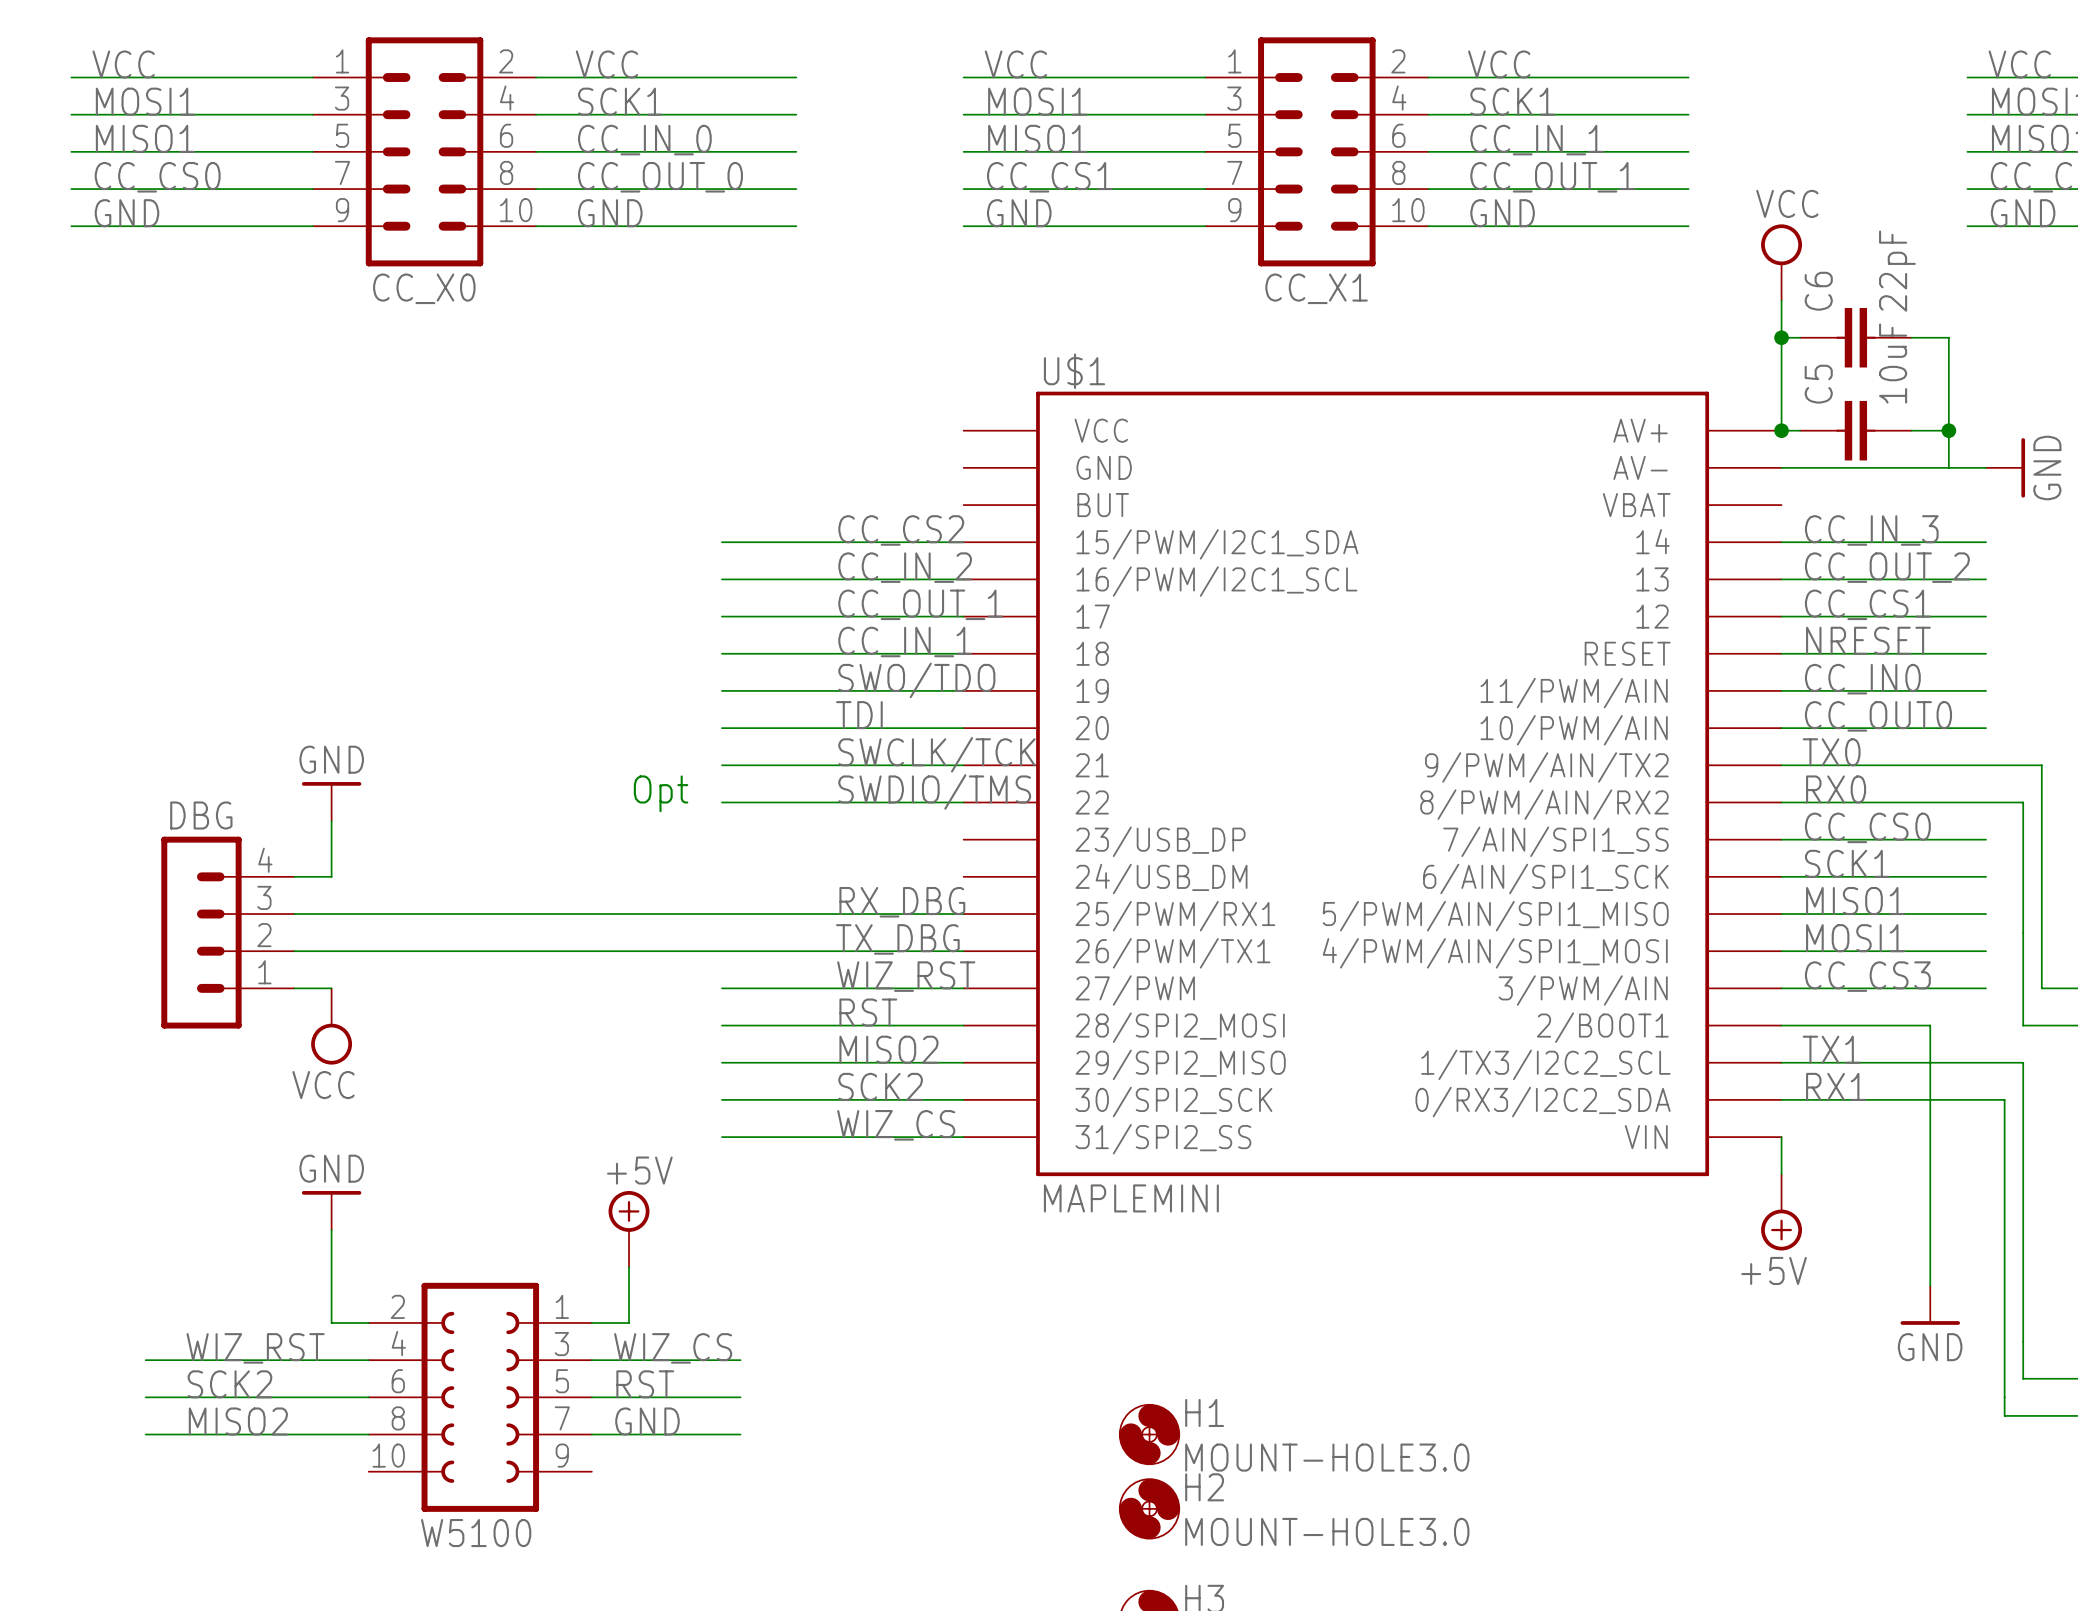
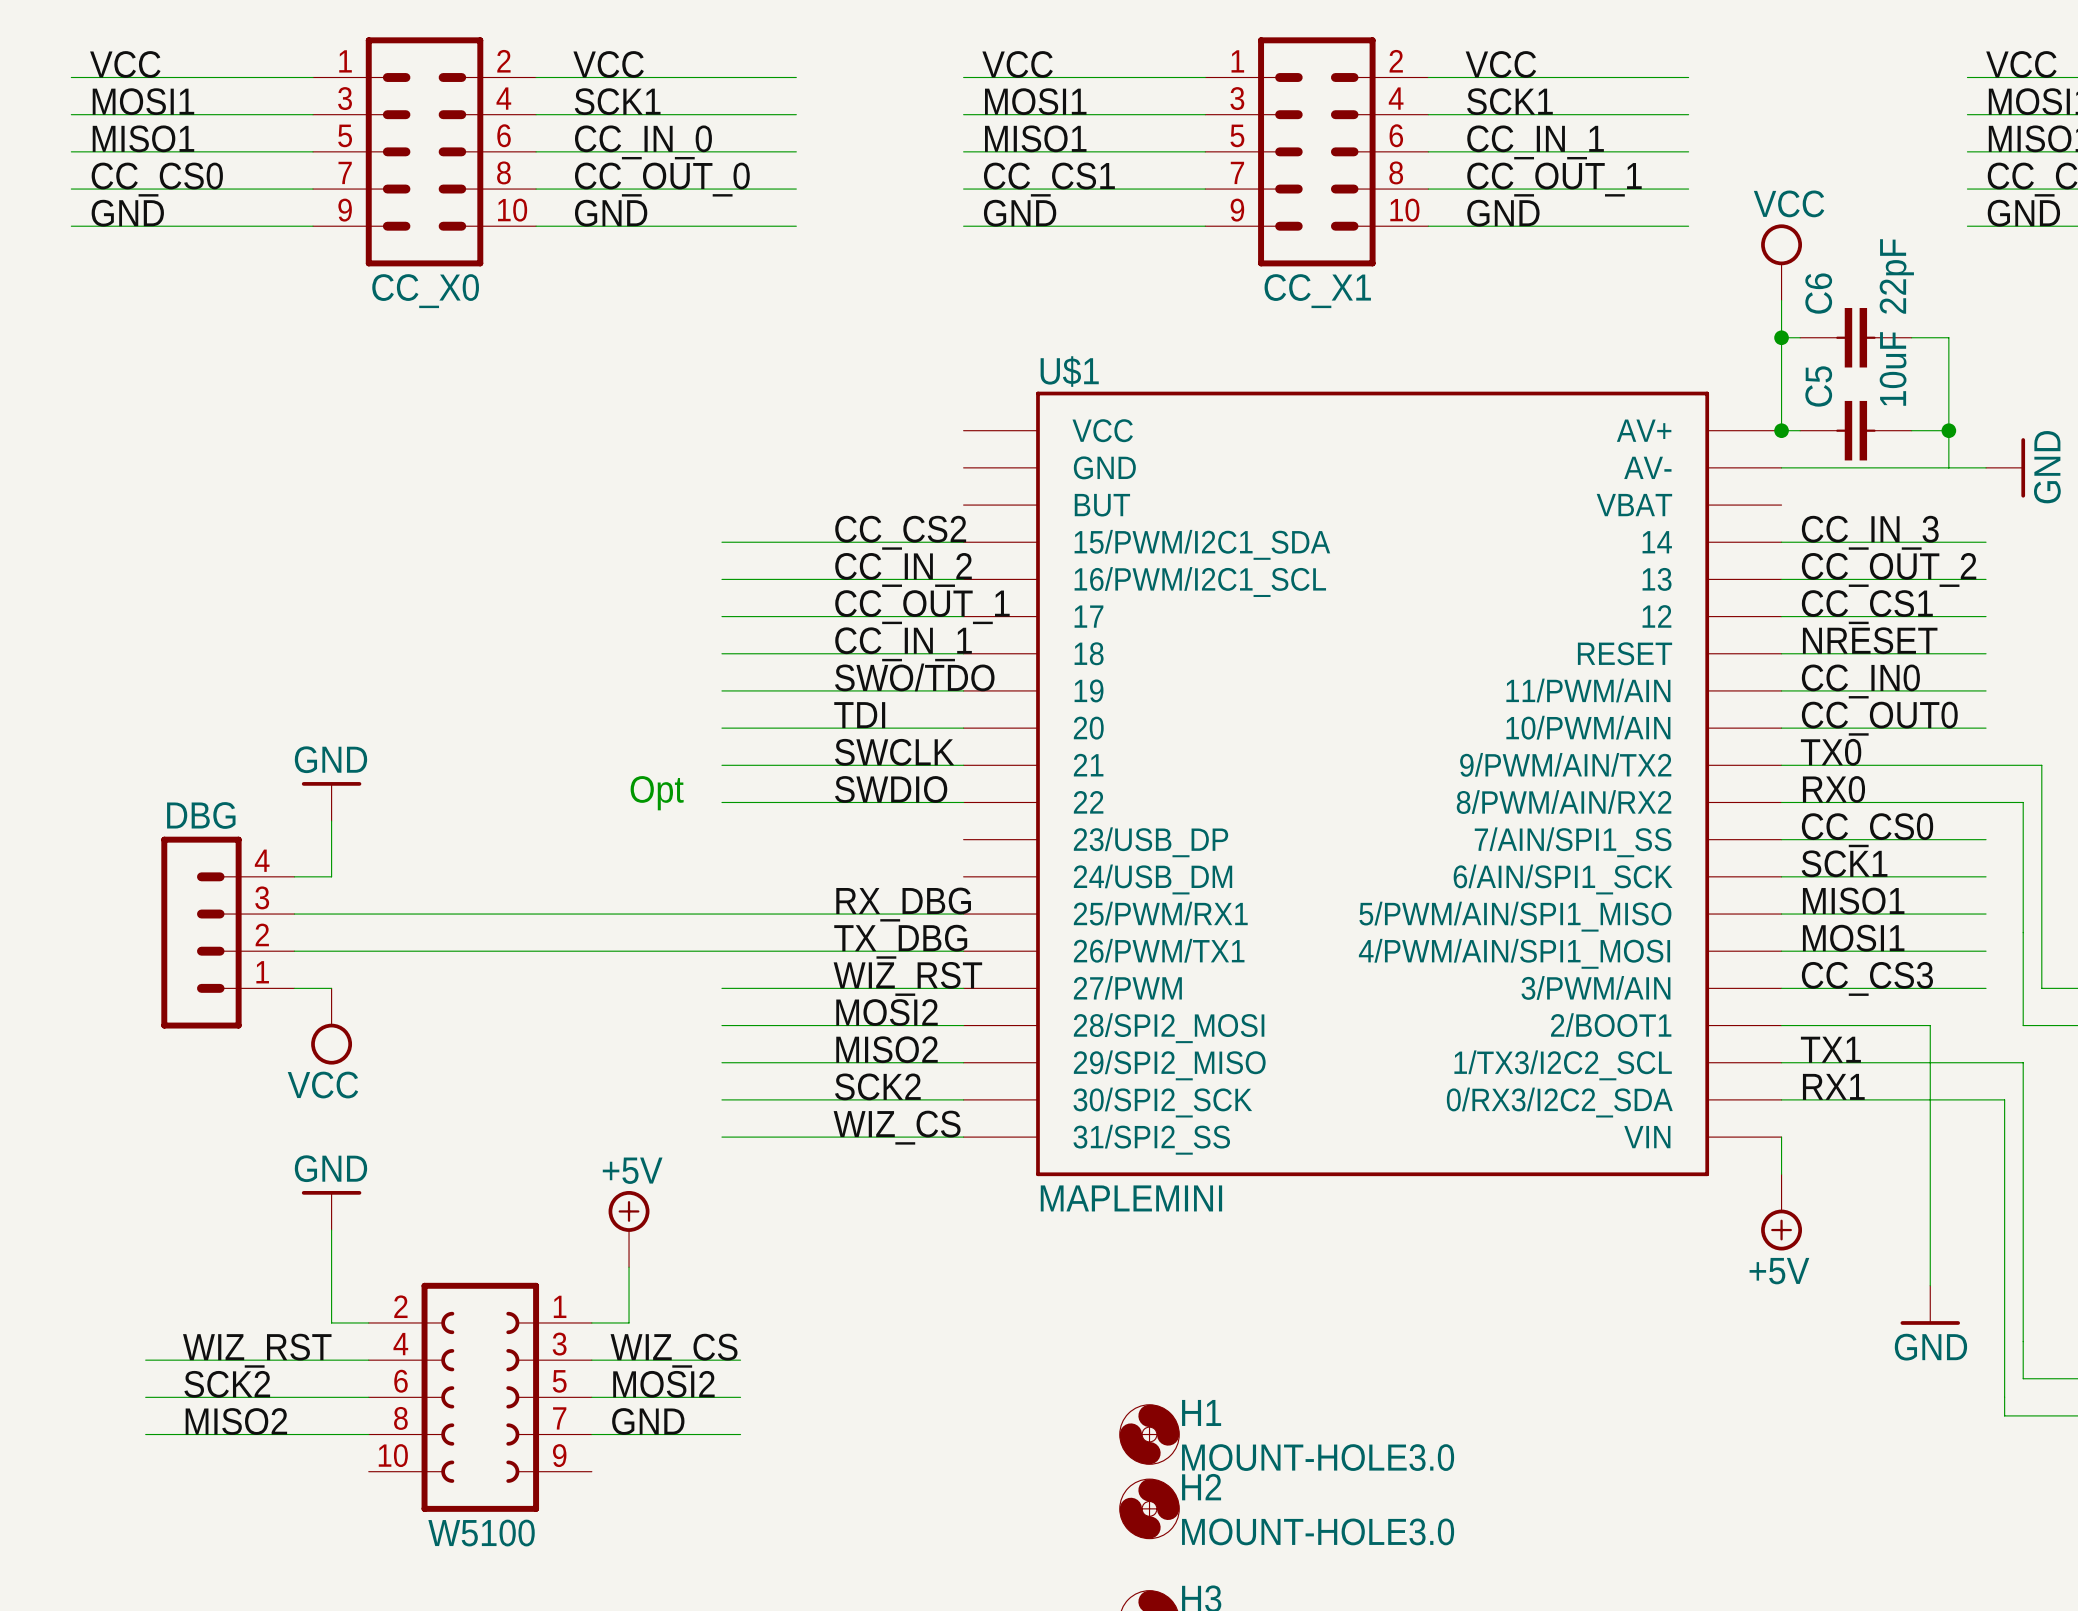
label: SWCLK/TCK (936, 754) -> SWCLK (894, 752)
label: SWDIO/TMS (934, 791) -> SWDIO (891, 789)
label: RST (868, 1012) -> MOSI2 (887, 1012)
label: RST (645, 1384) -> MOSI2 (663, 1384)

